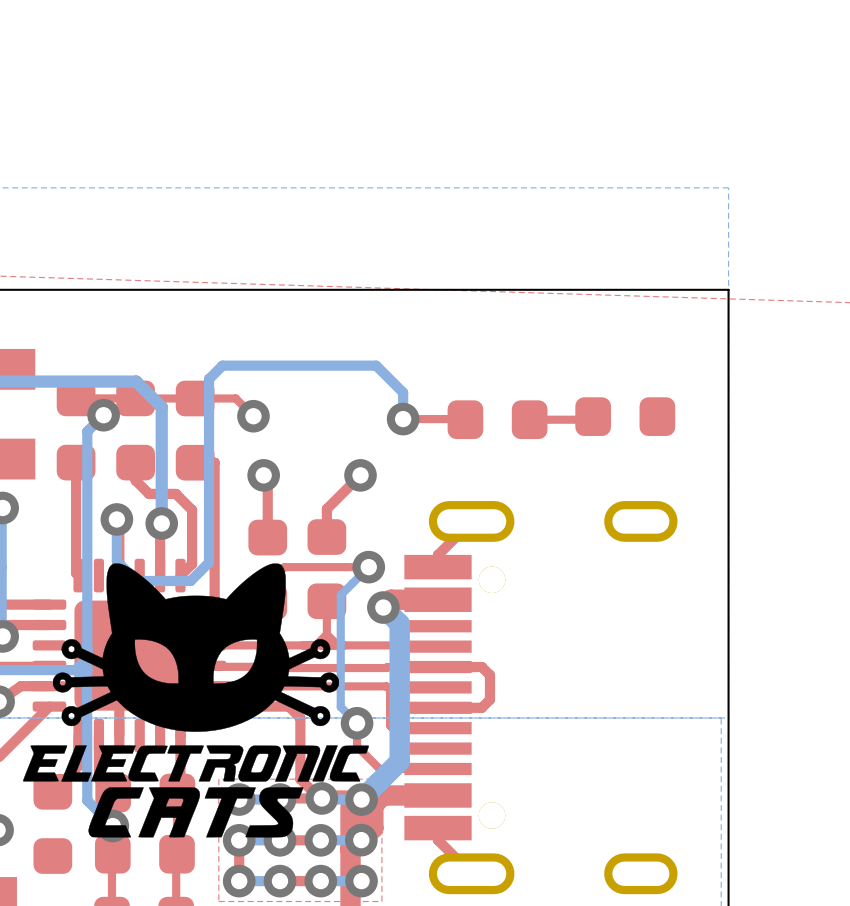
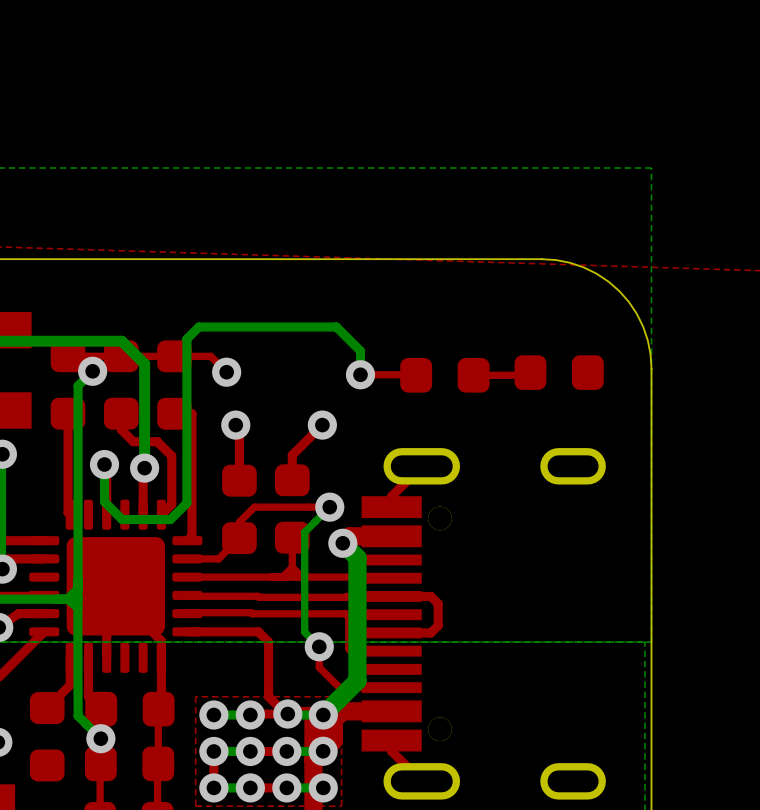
board edge: (606, 289) (728, 289) (728, 412) -> (542, 259) (556, 260) (583, 267) (596, 273) (619, 291) (636, 313) (643, 326) (650, 354) (651, 368)
drawing: [23, 563, 369, 838] -> none

